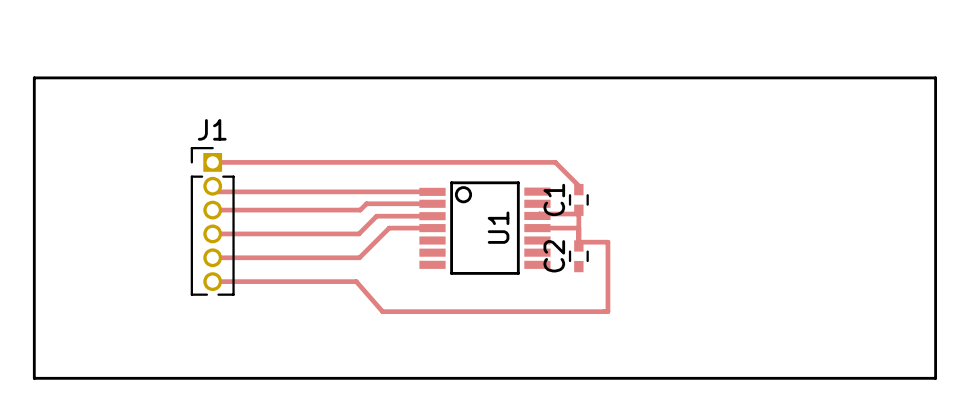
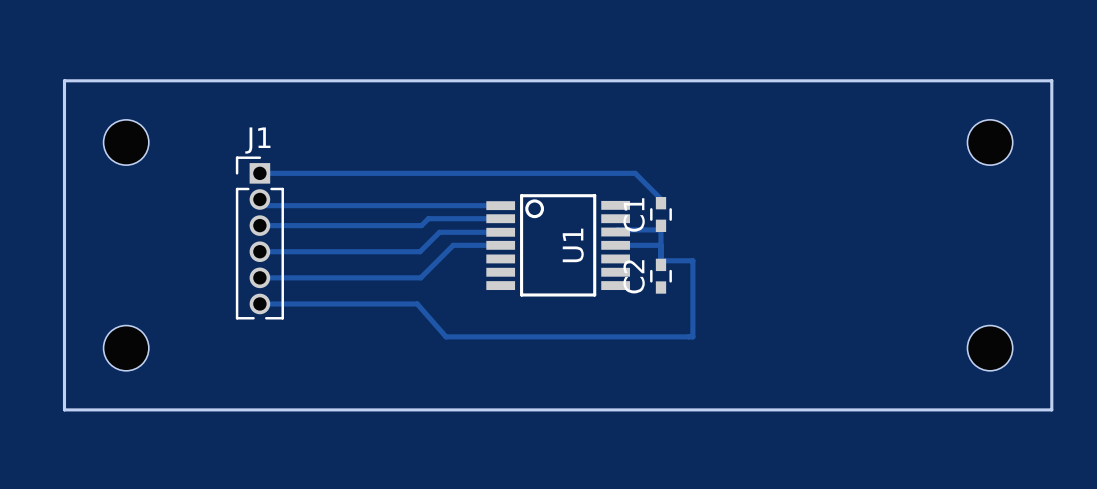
part: none -> (126, 142)
part: none -> (990, 142)
part: none -> (126, 348)
part: none -> (990, 348)

